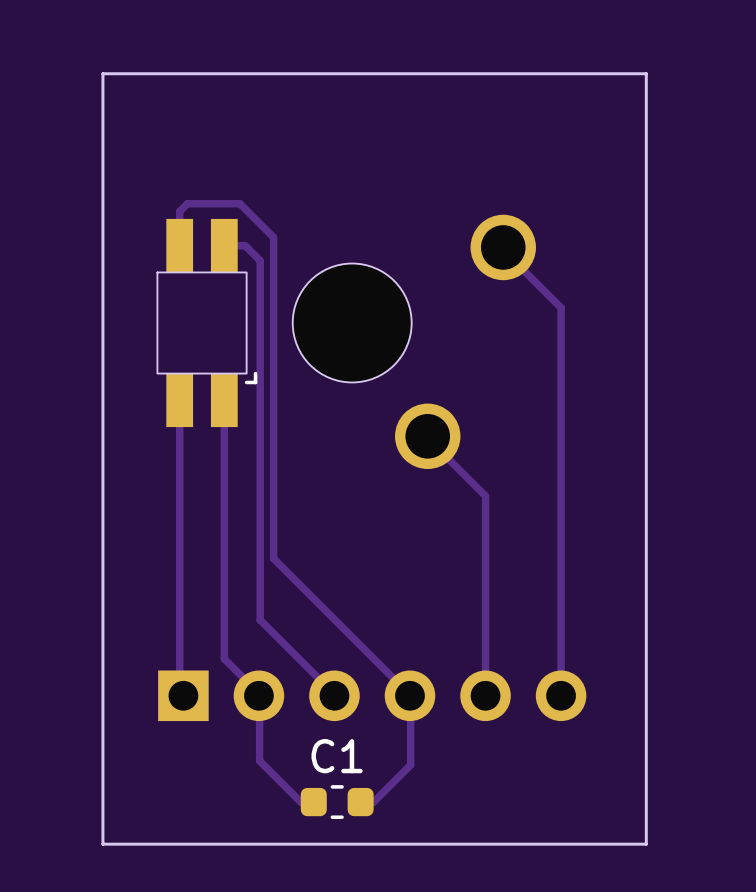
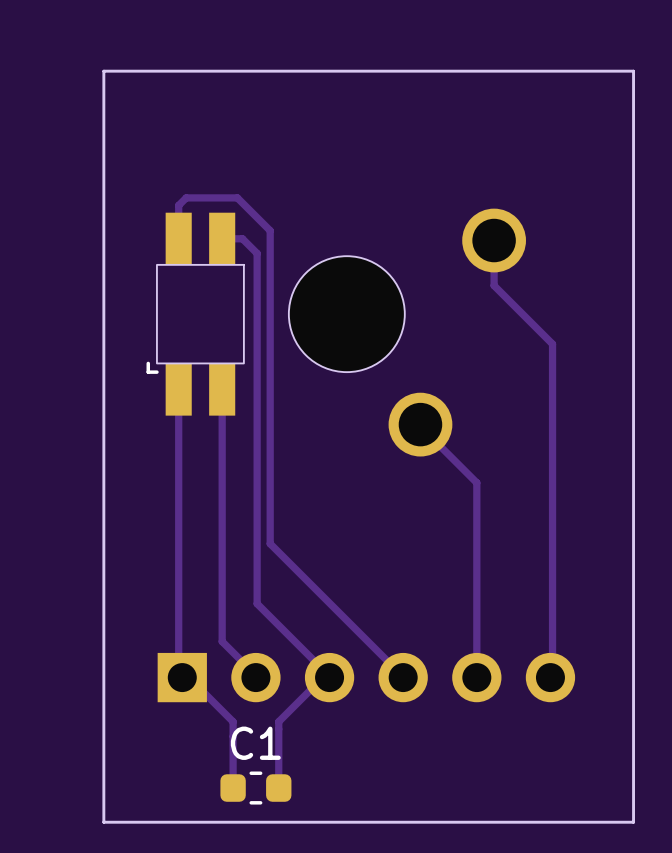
part footprint: [157, 214, 536, 470] -> [146, 208, 526, 457]
track: none -> (494, 240) (494, 285) (552, 344) (552, 677)
track: (505, 252) (561, 307) (561, 695) -> none
track: none -> (182, 670) (233, 721) (233, 785)
track: none -> (329, 670) (278, 721) (278, 781)
track: (410, 697) (410, 765) (373, 802) (360, 802) -> none
track: (259, 698) (259, 760) (300, 802) (313, 802) -> none
C1 position: (337, 802) -> (255, 788)

